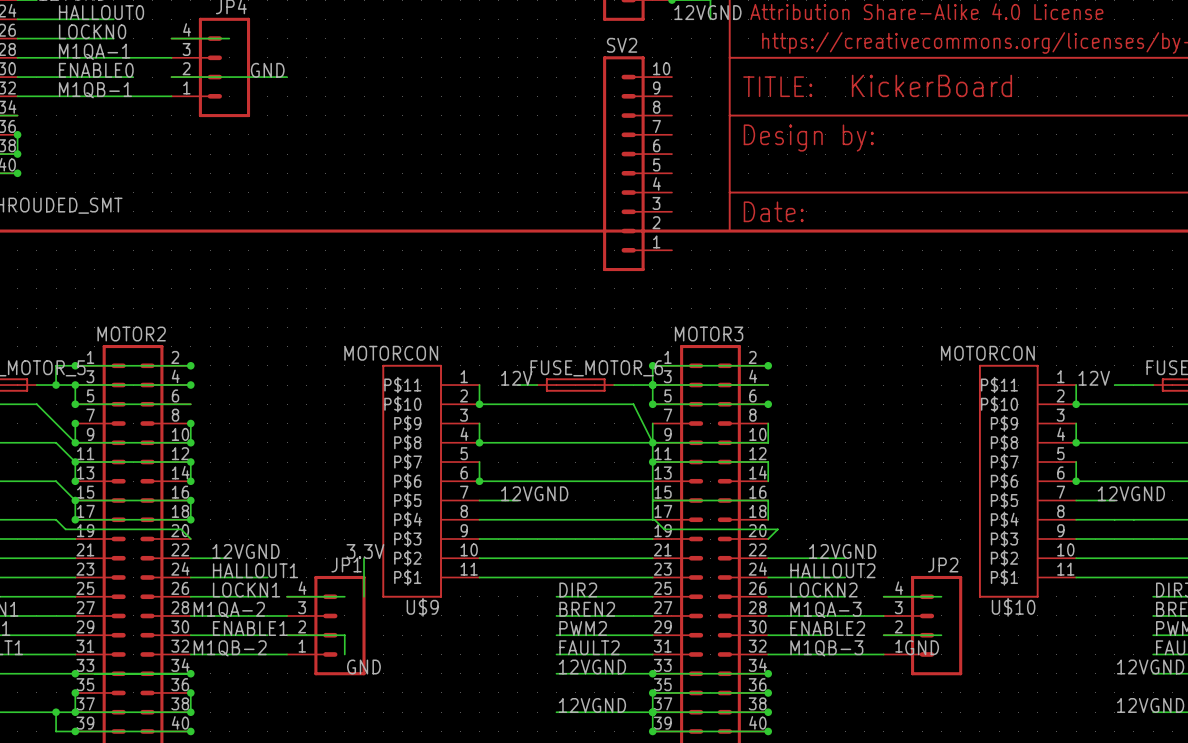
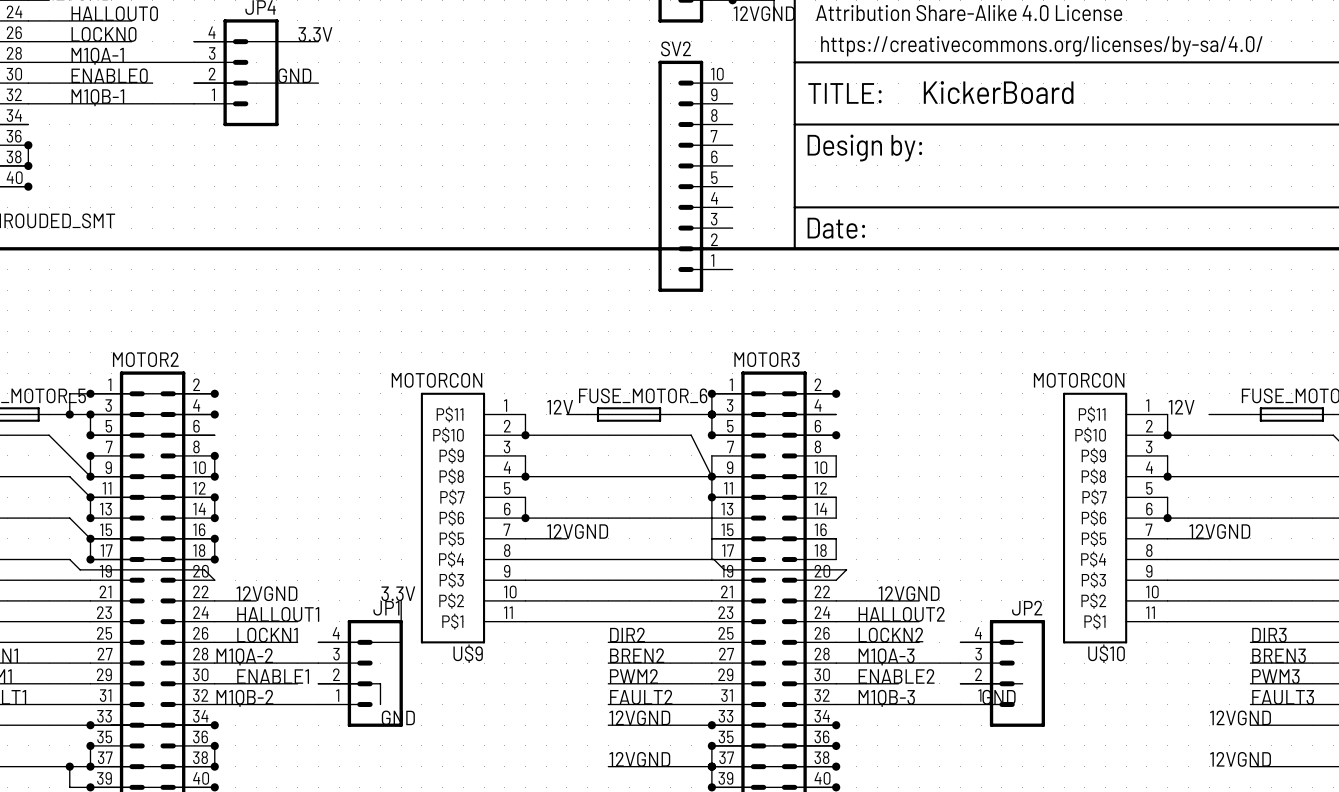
label: none -> 3.3V (315, 34)
wire: none -> (256, 41) (318, 41)
wire: none -> (380, 642) (401, 642)

